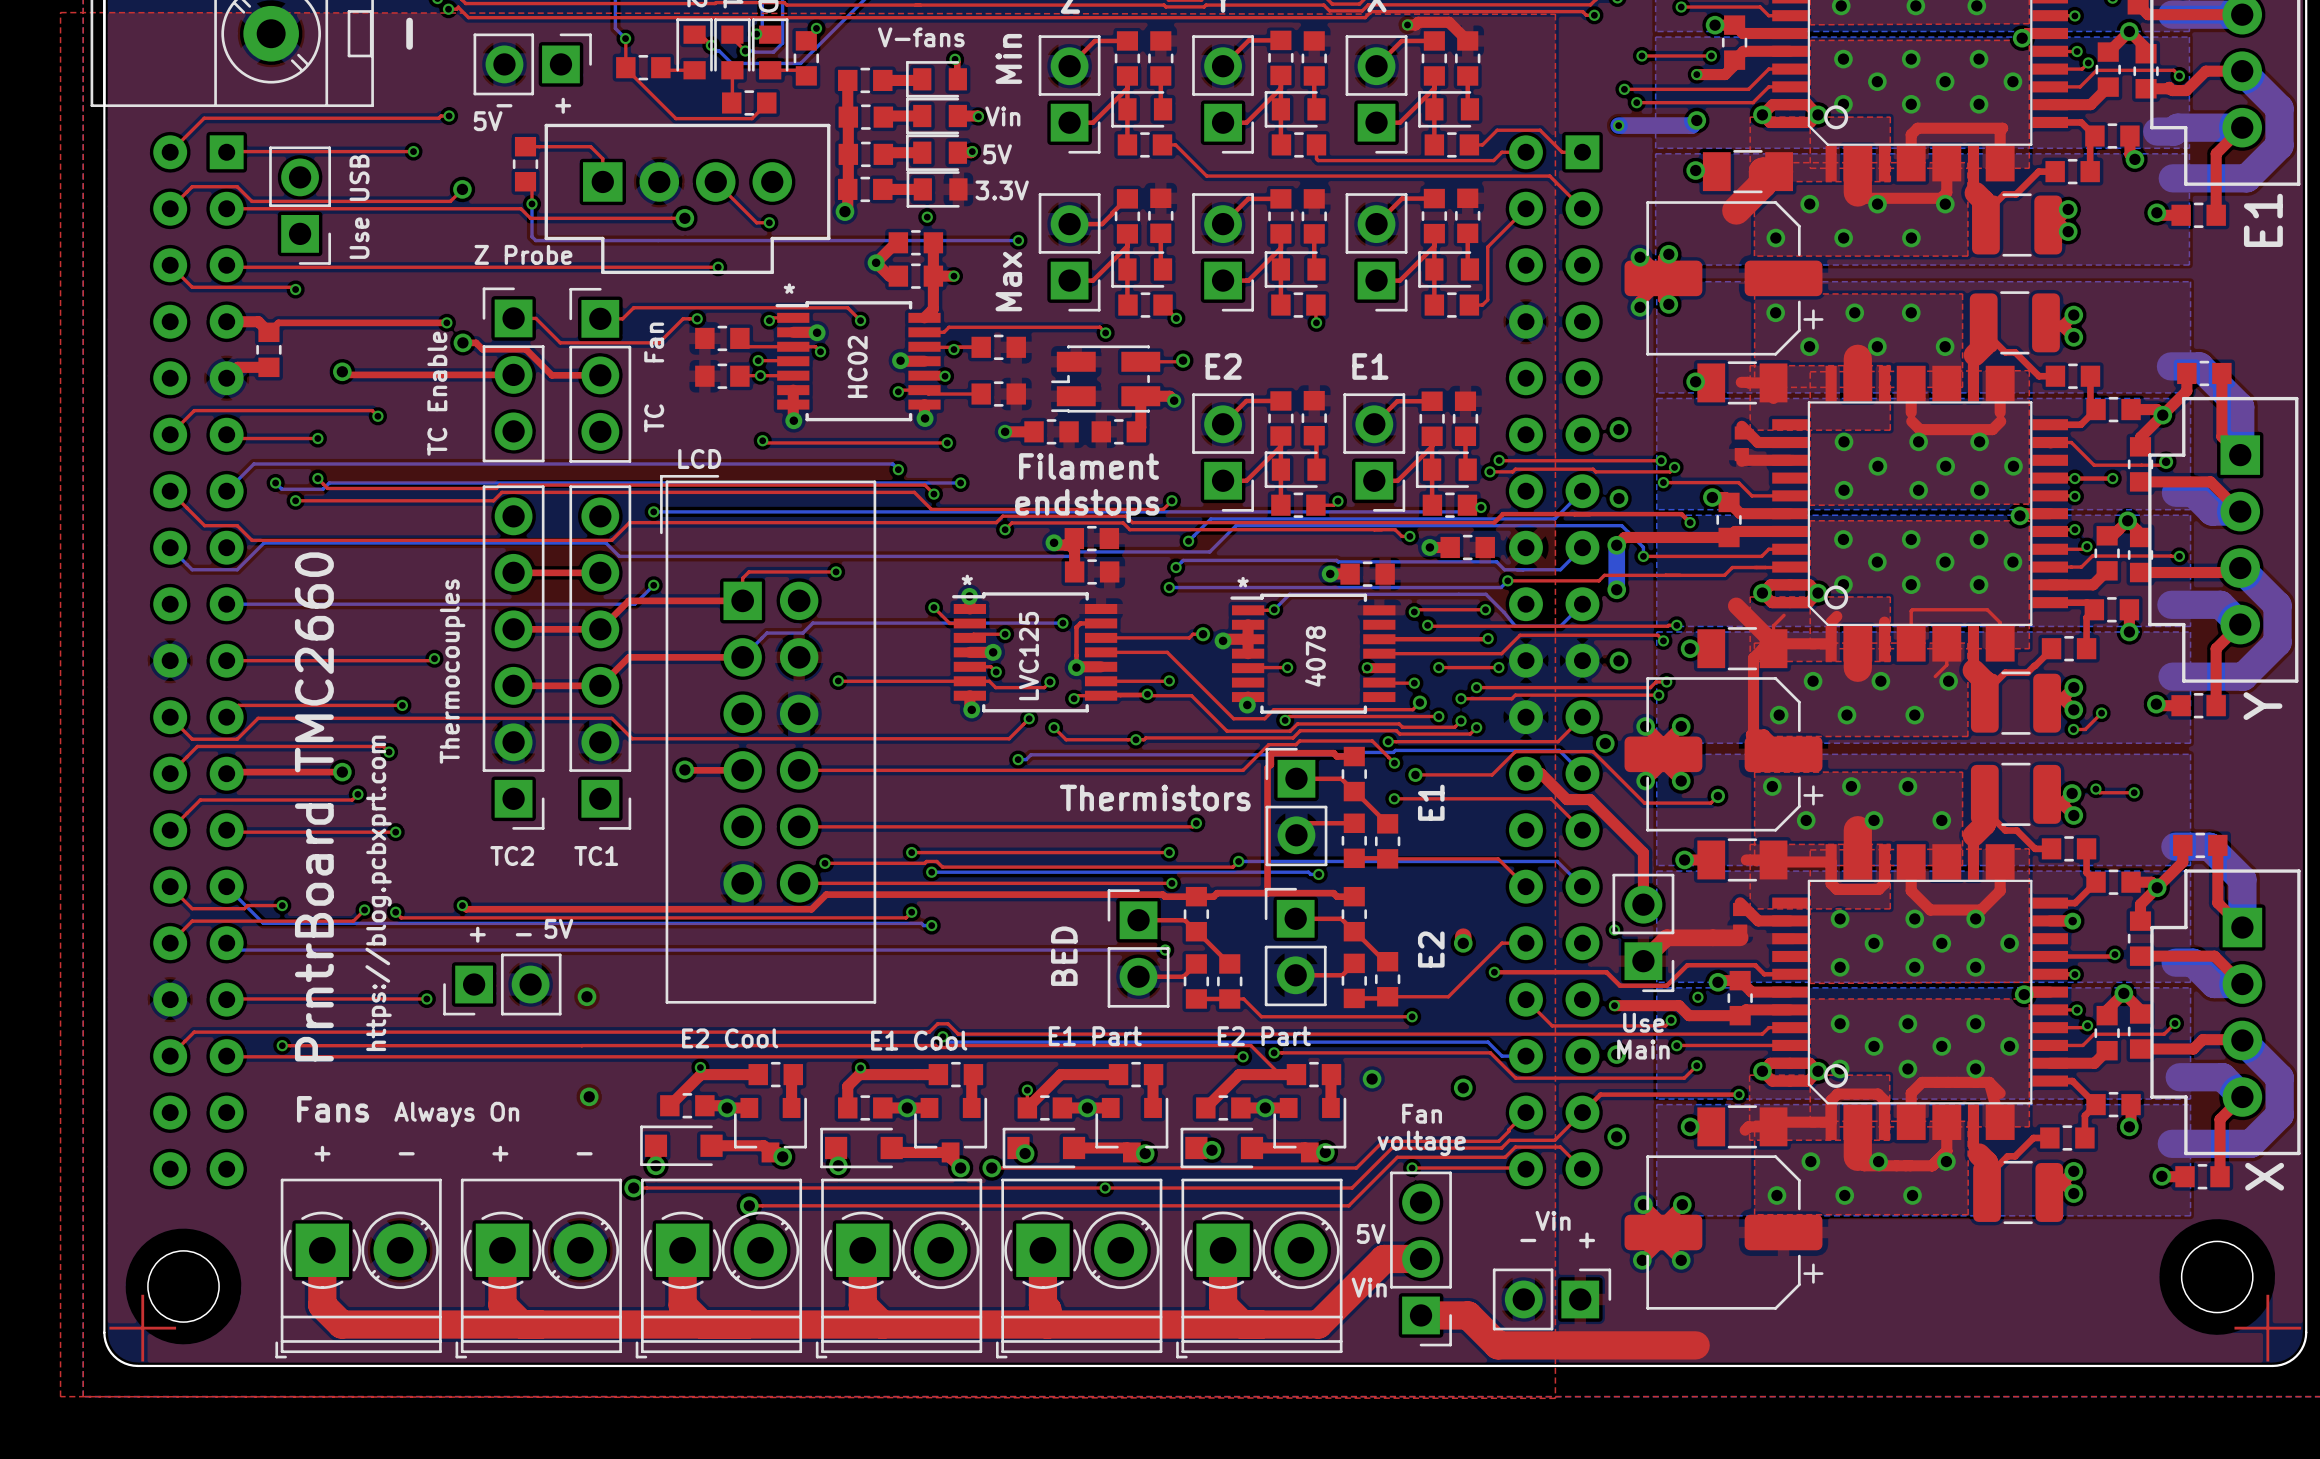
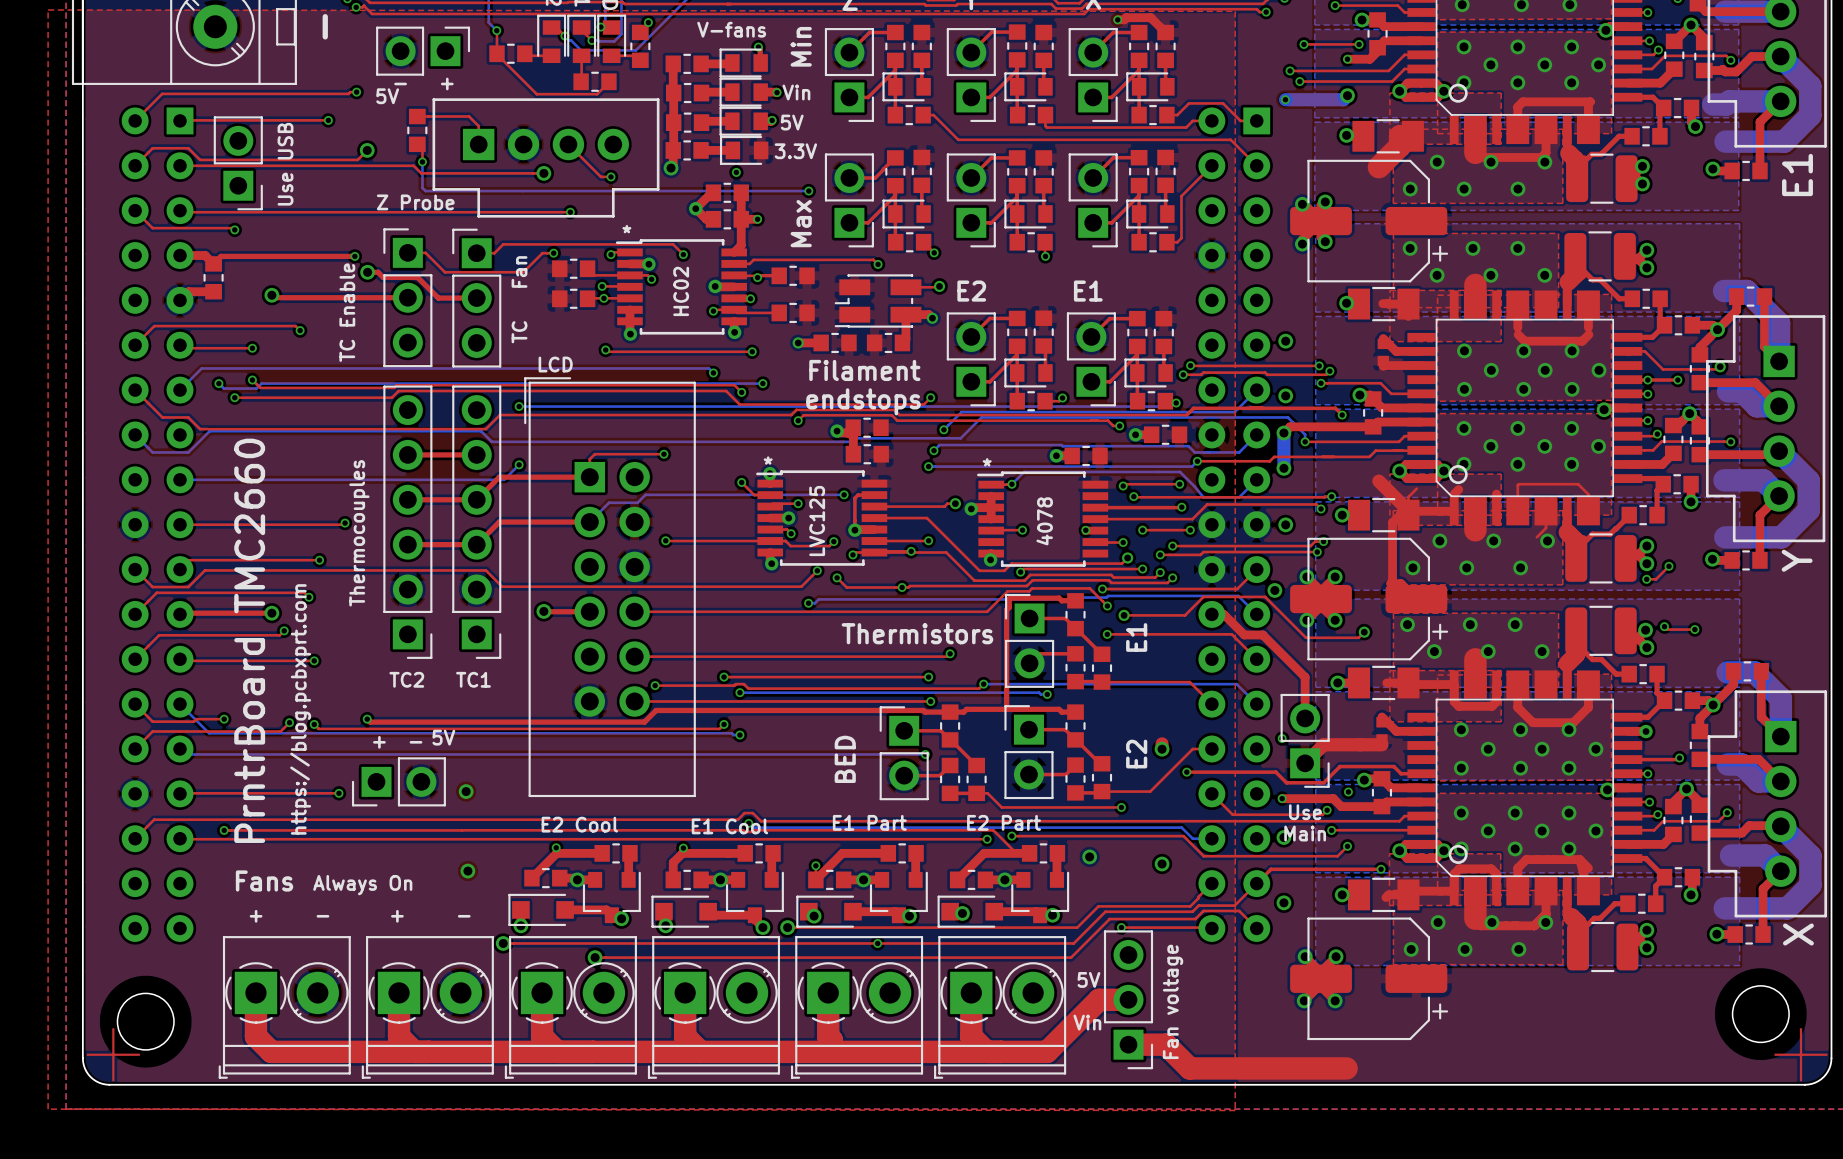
text: Fan (1422, 1113) -> none
text: voltage (1421, 1143) -> none
text: Vin (1553, 1220) -> none
text: + - (1557, 1240) -> none
text: none -> Fan voltage (1173, 1001)
part: (1552, 1299) -> none

